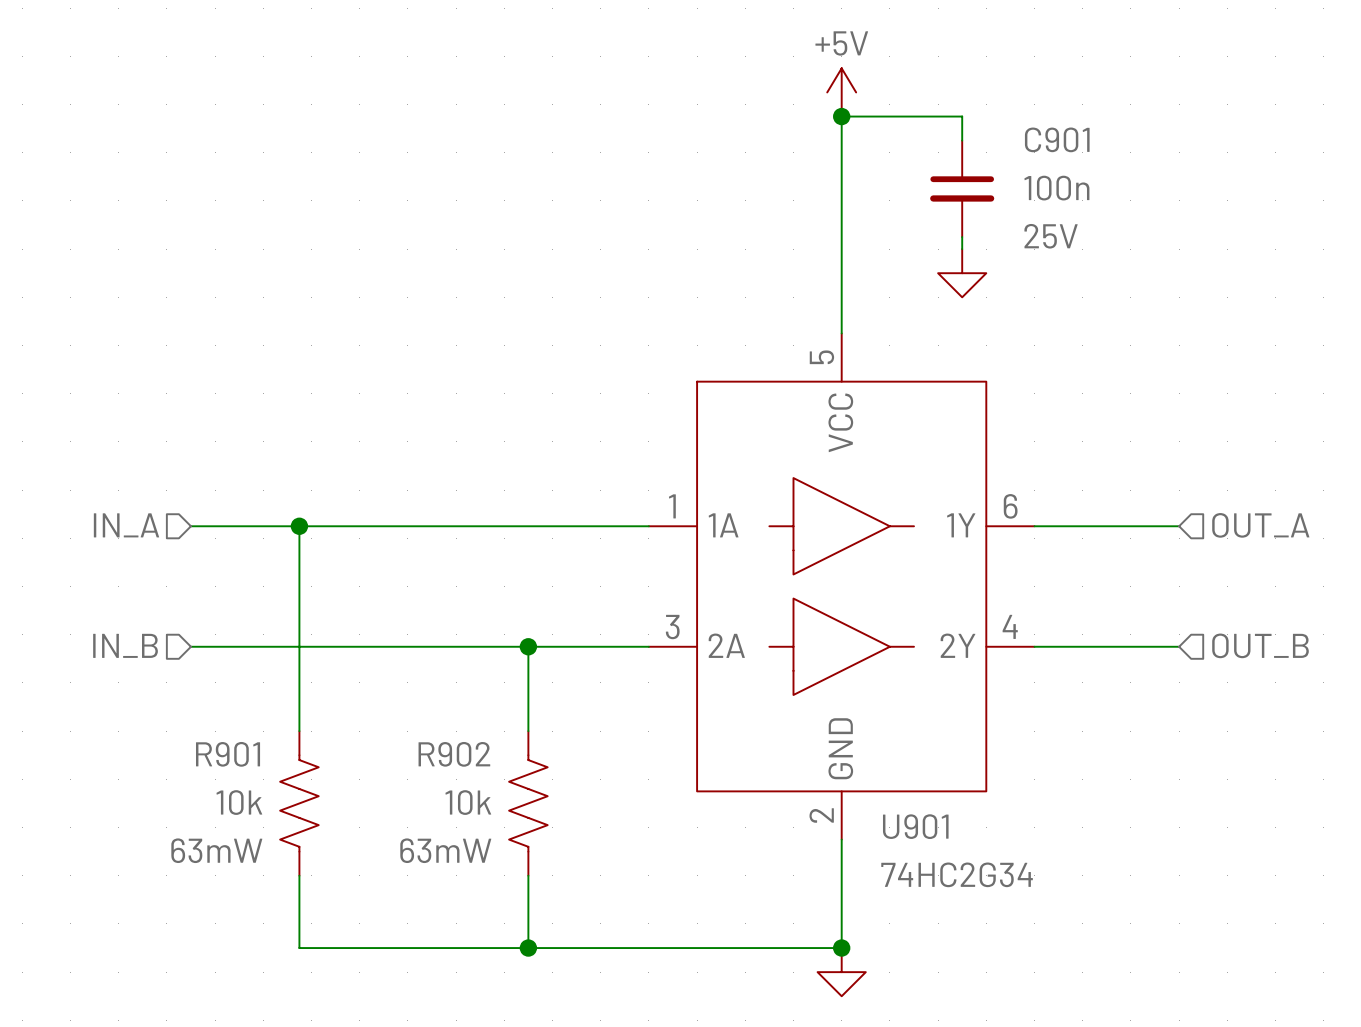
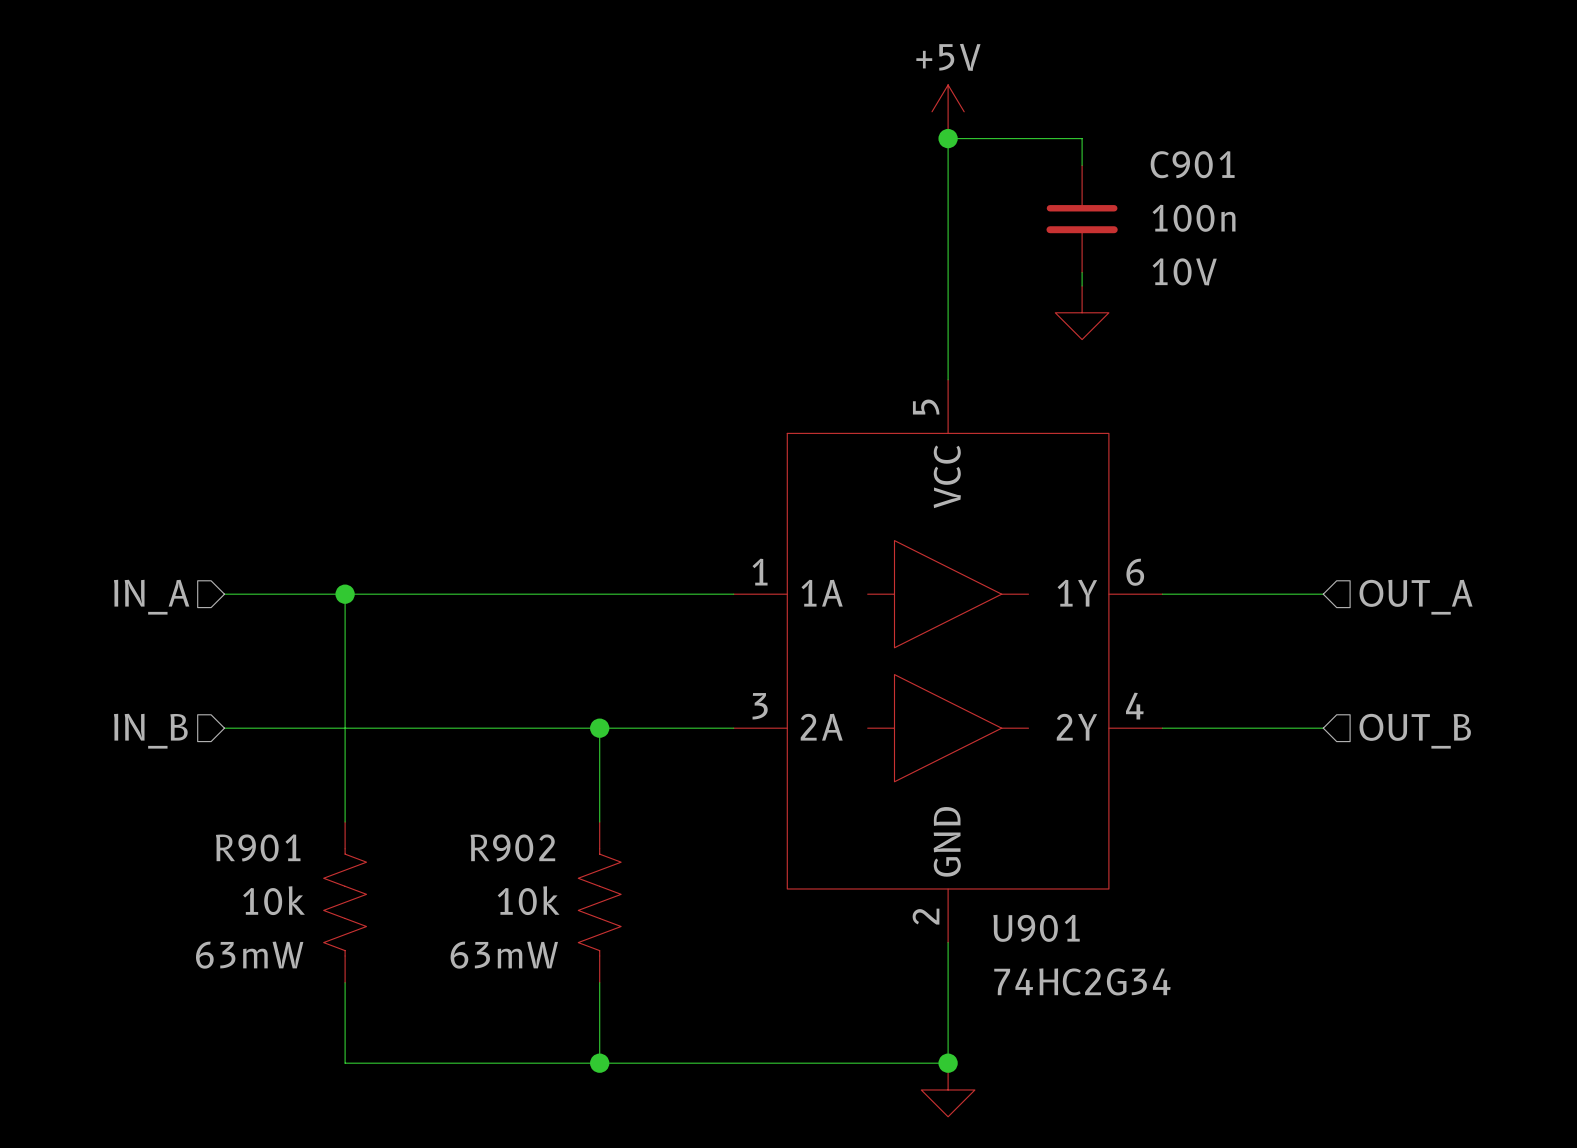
C901 text: 25V (1051, 236) -> 10V (1184, 271)

